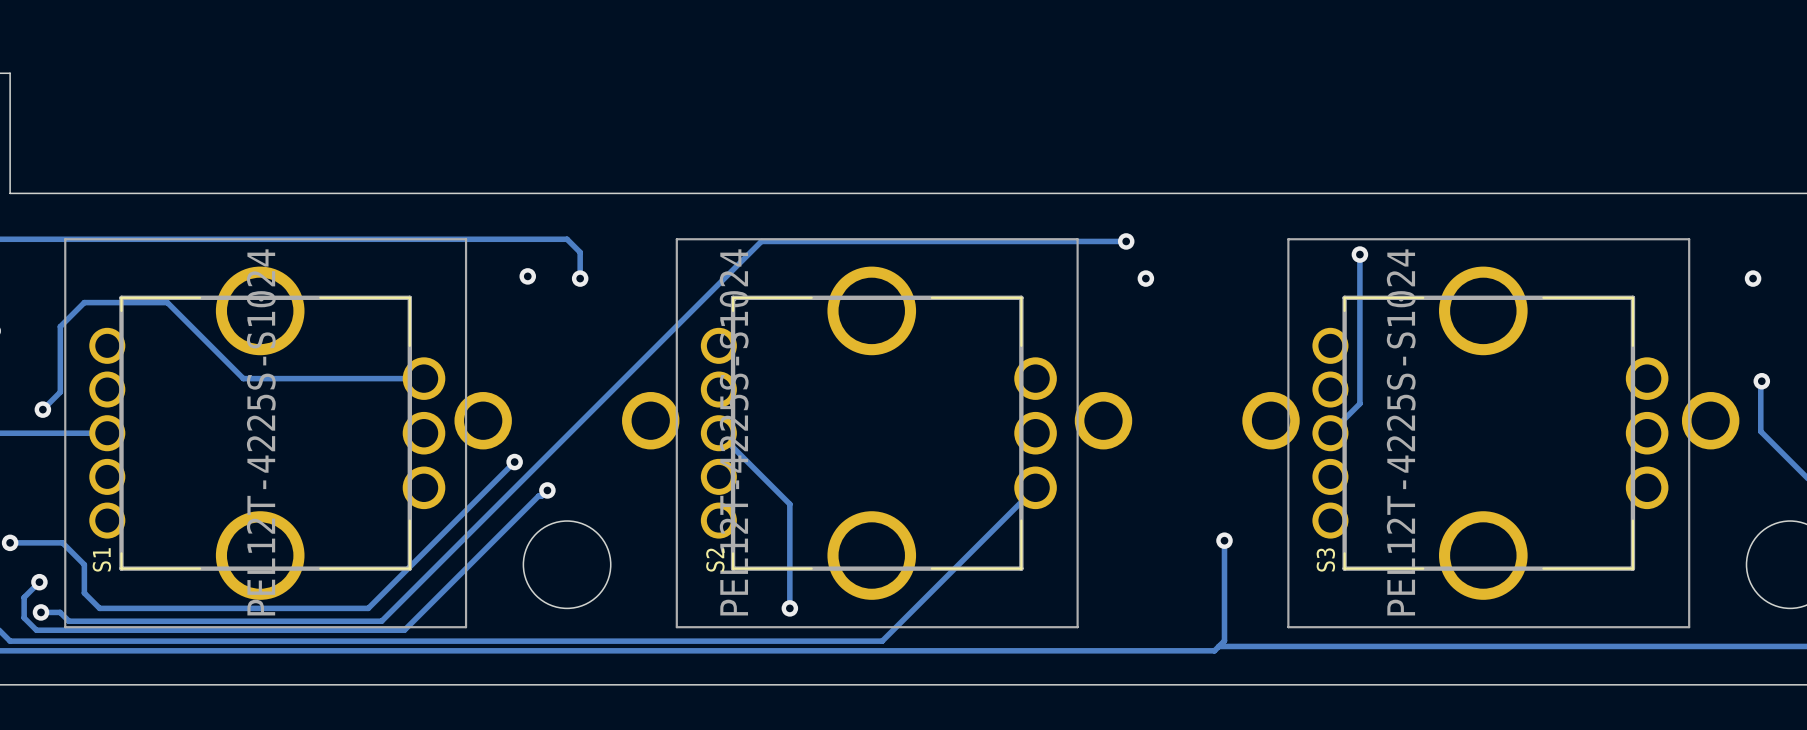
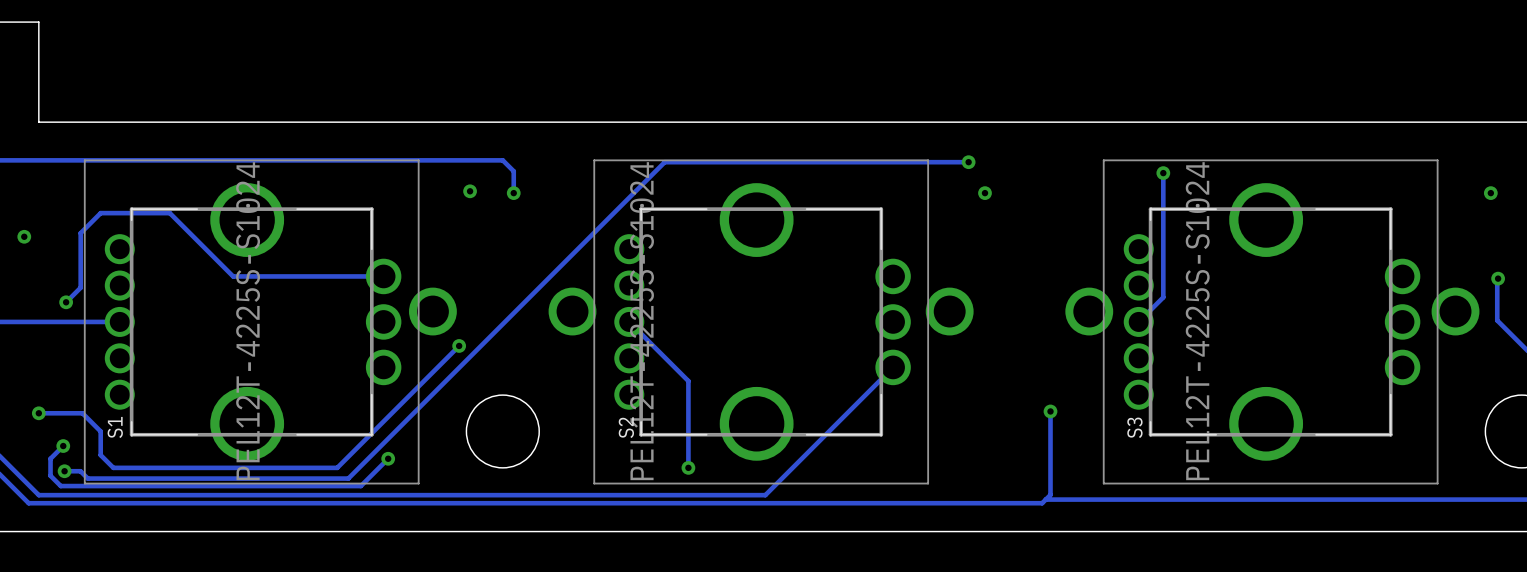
track: (547, 490) (541, 496) (538, 496) (404, 630) (396, 630) -> (388, 458) (360, 486)
via: (547, 490) -> none
via: none -> (388, 458)

